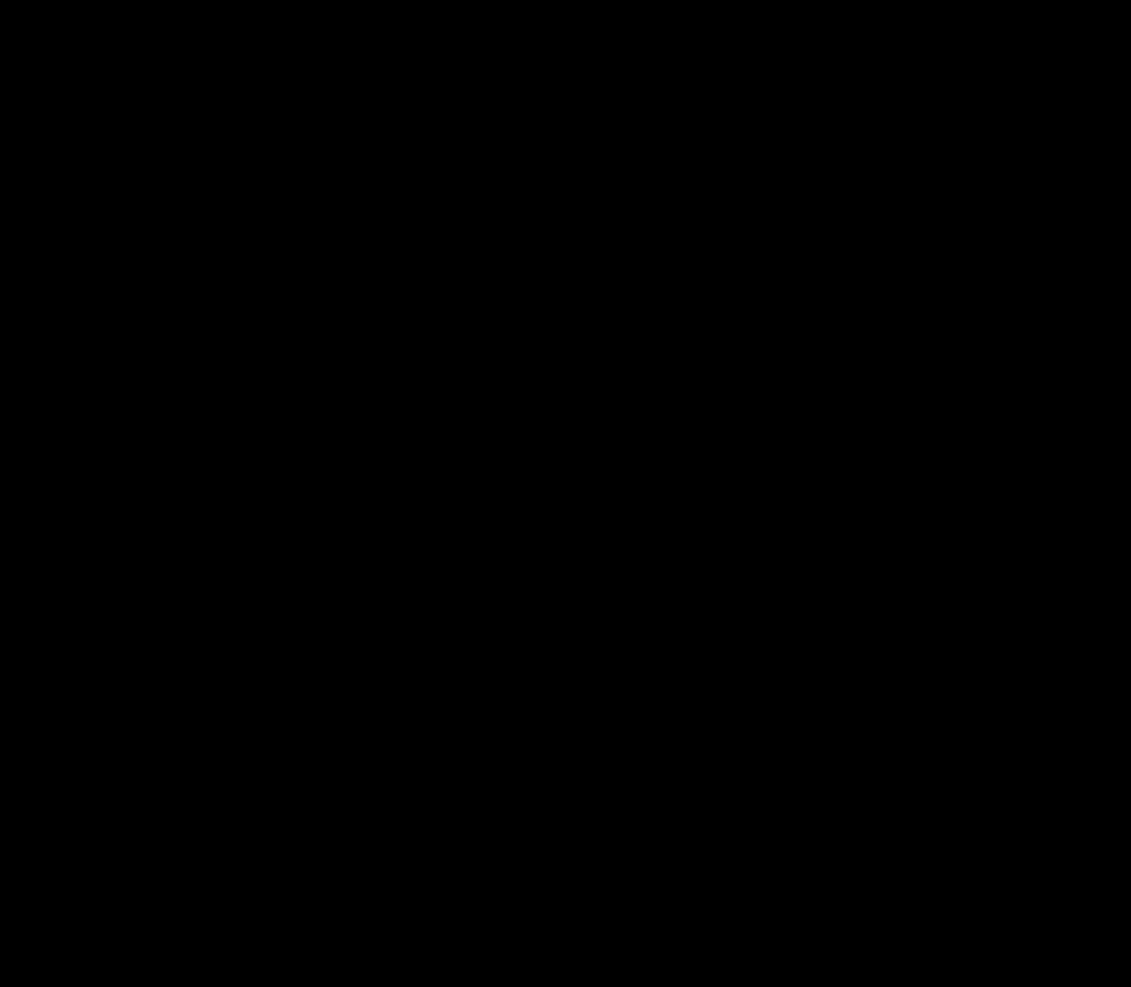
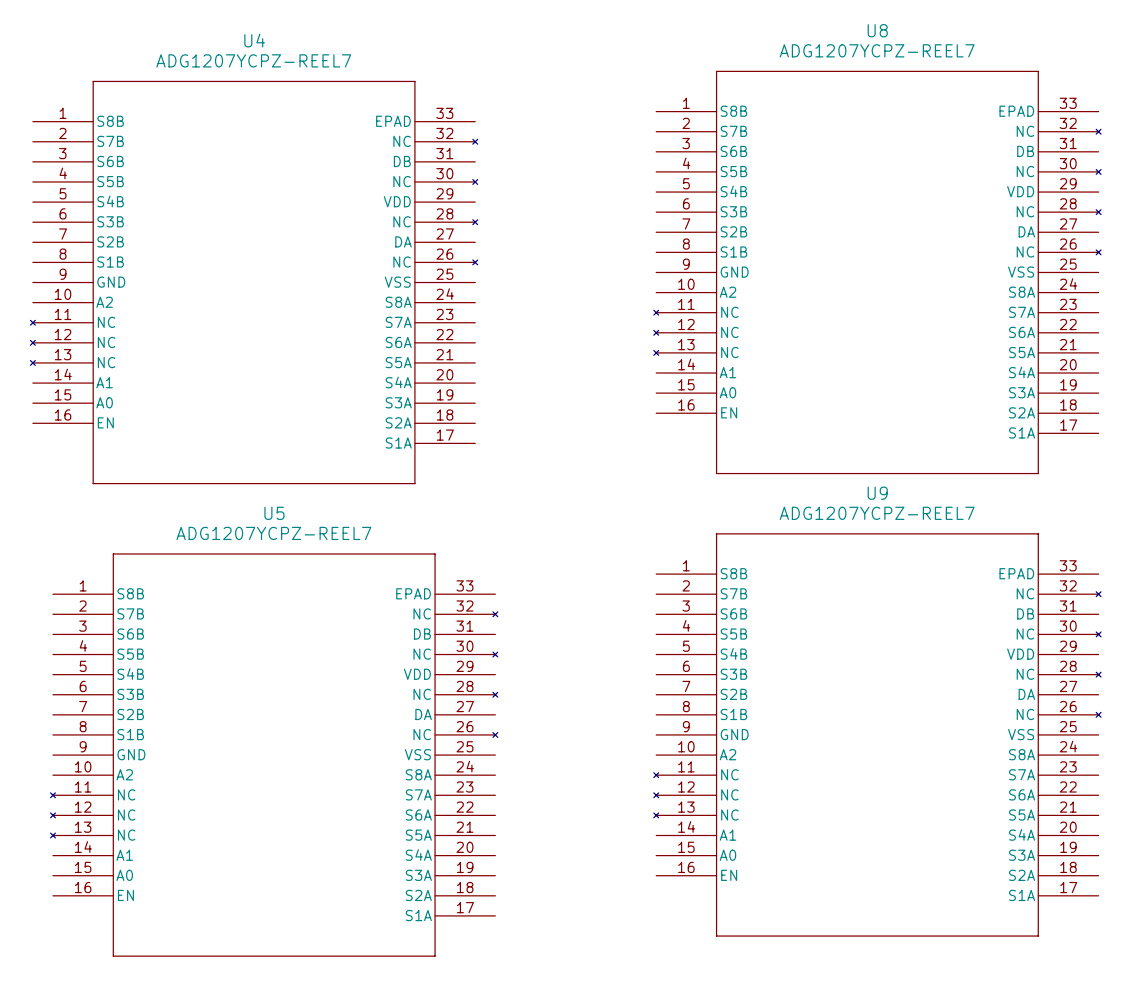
U8: none -> ADG1207YCPZ-REEL7 (877, 272)
U4: none -> ADG1207YCPZ-REEL7 (254, 282)
U9: none -> ADG1207YCPZ-REEL7 (877, 734)
U5: none -> ADG1207YCPZ-REEL7 (274, 755)

